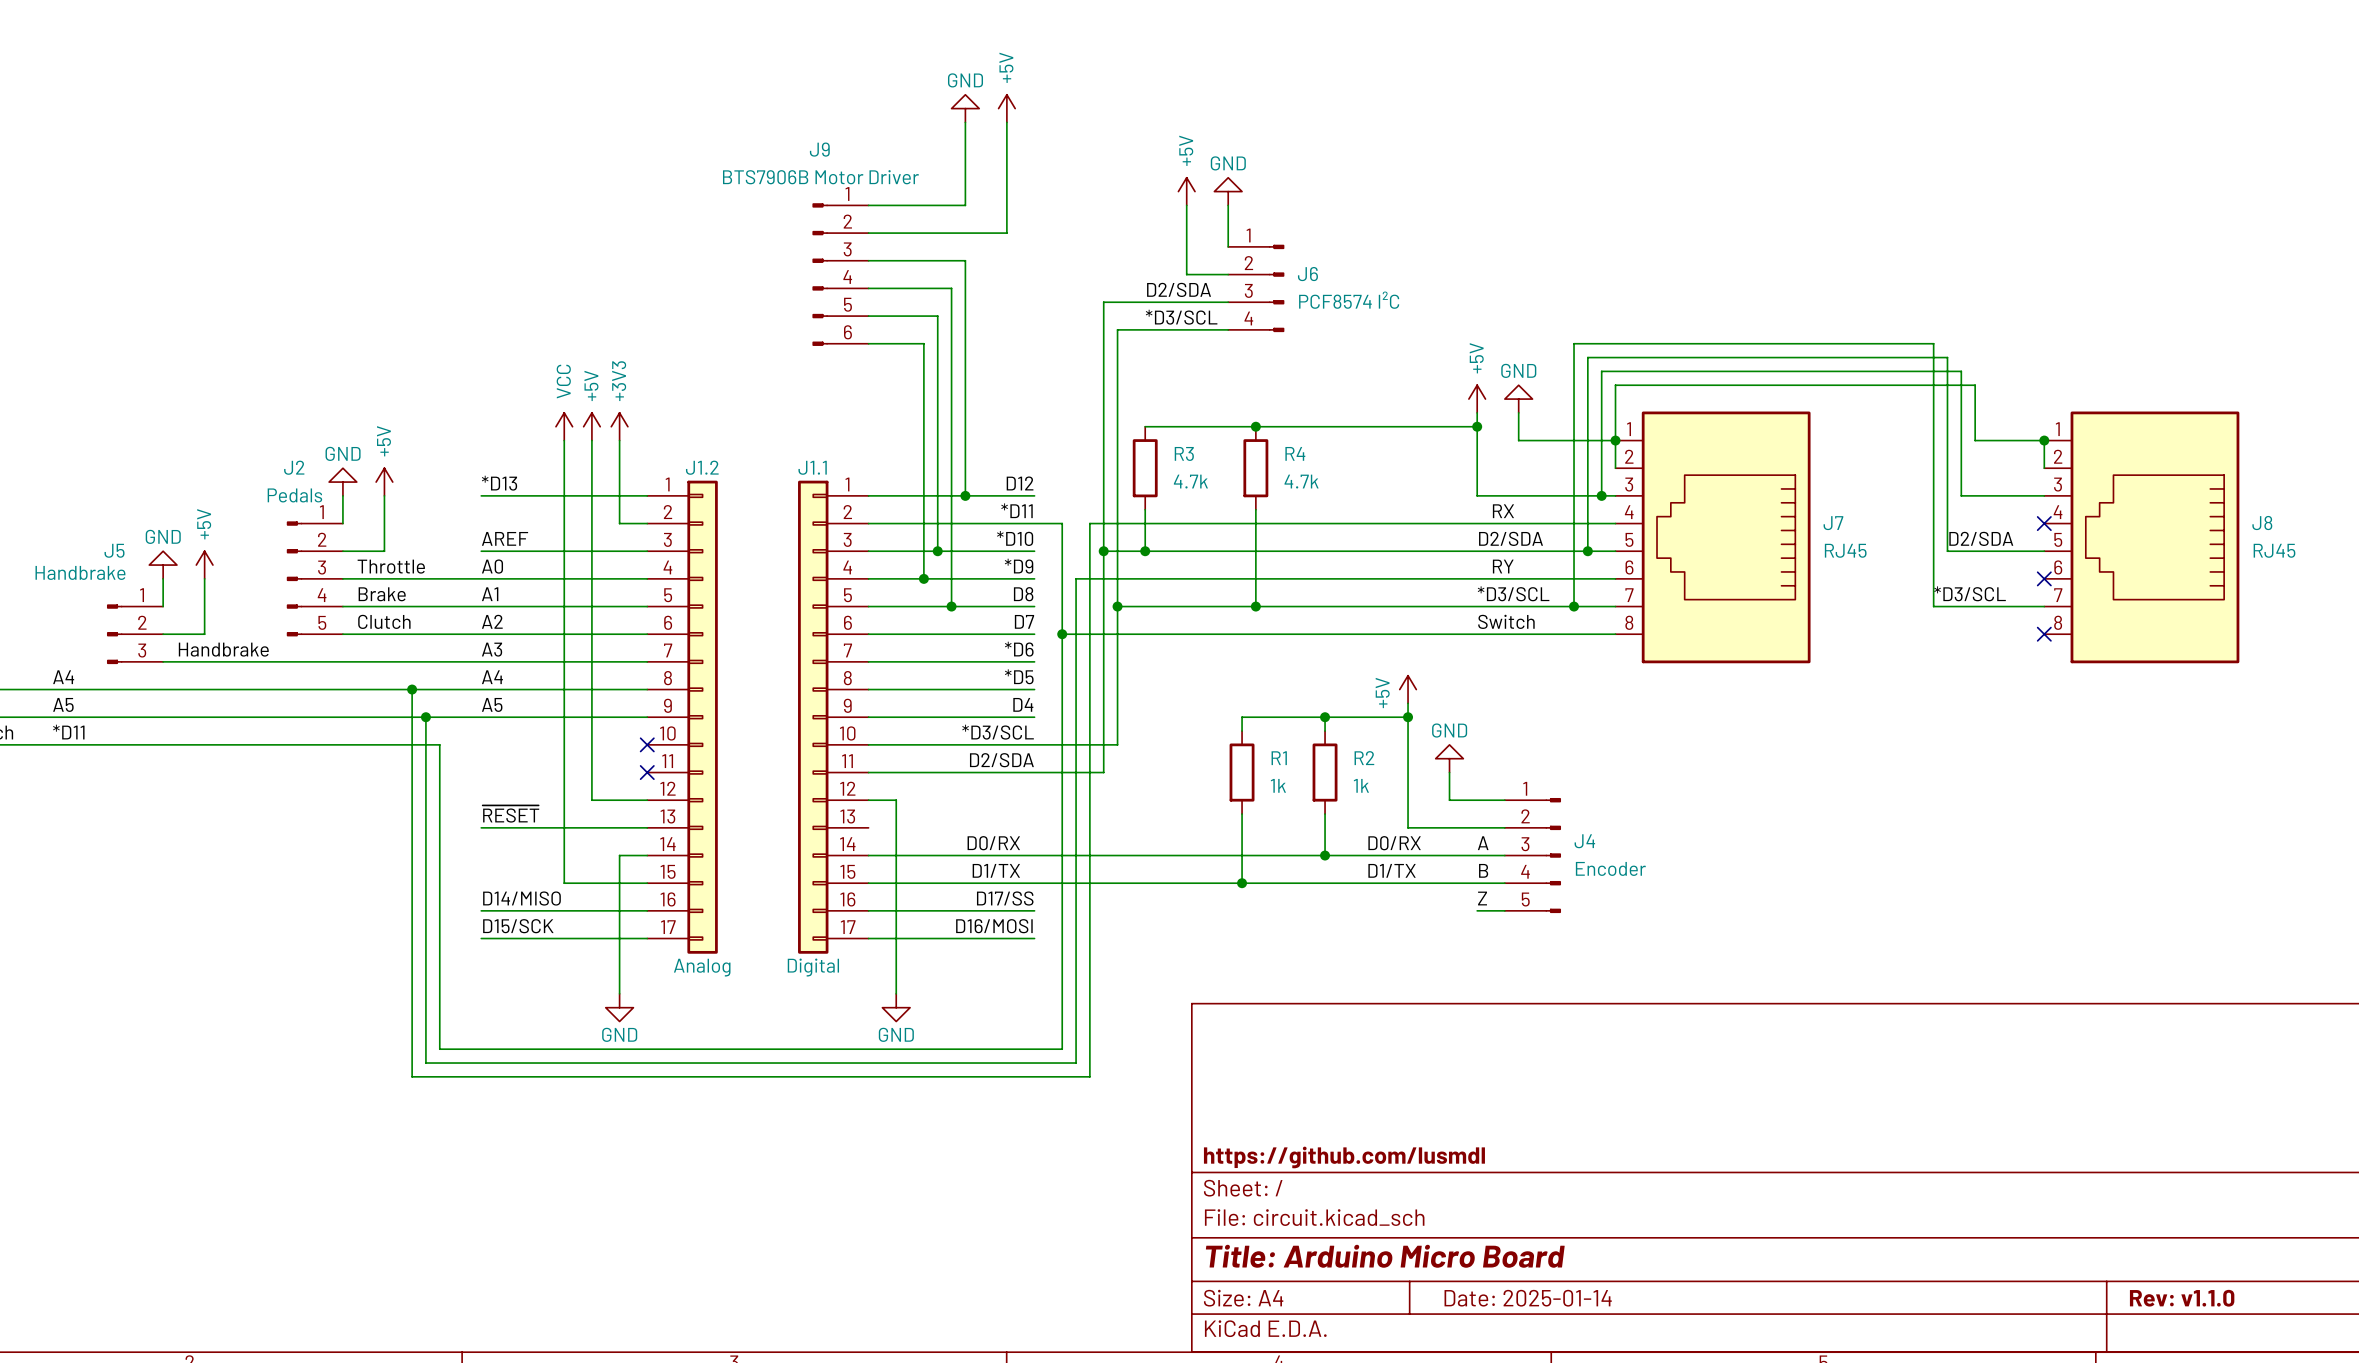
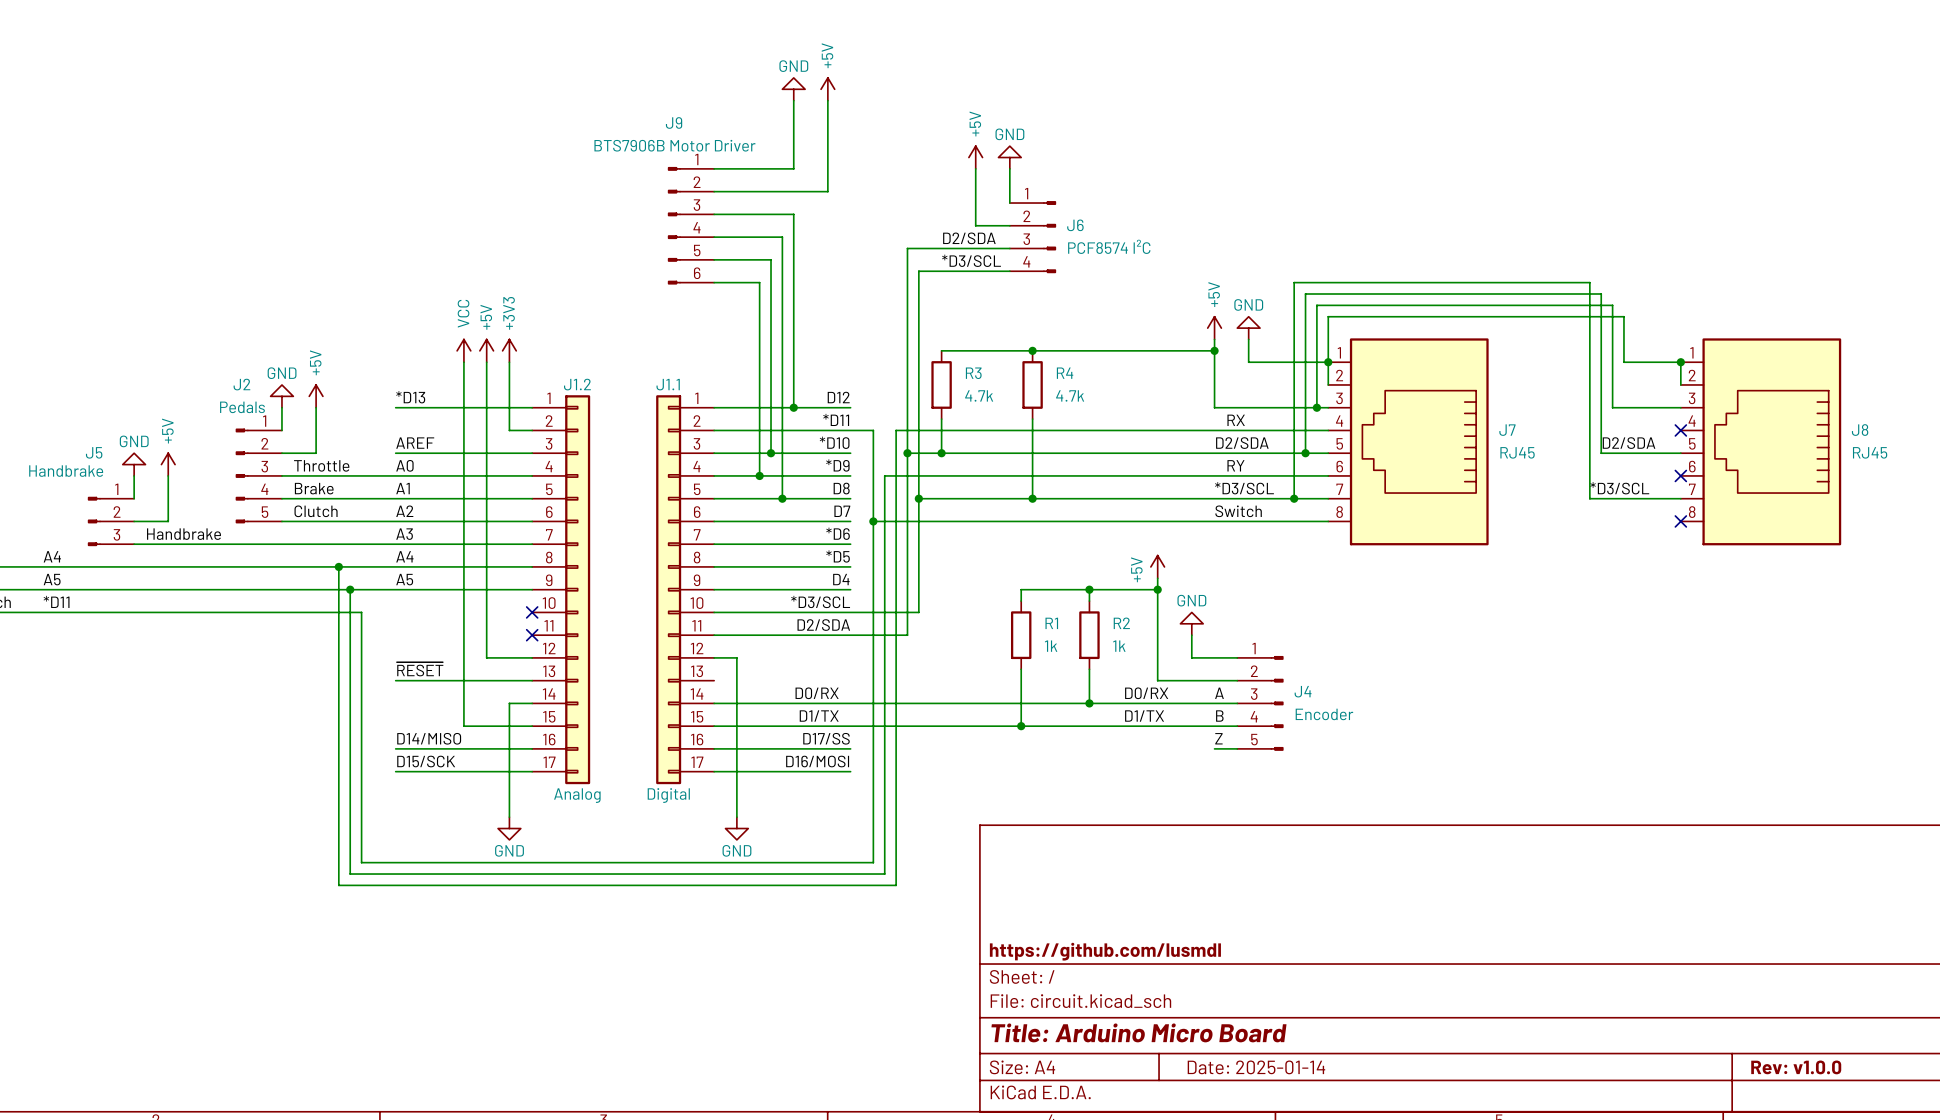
title block: Rev: v1.1.0 (2182, 1298) -> Rev: v1.0.0 (1796, 1067)

